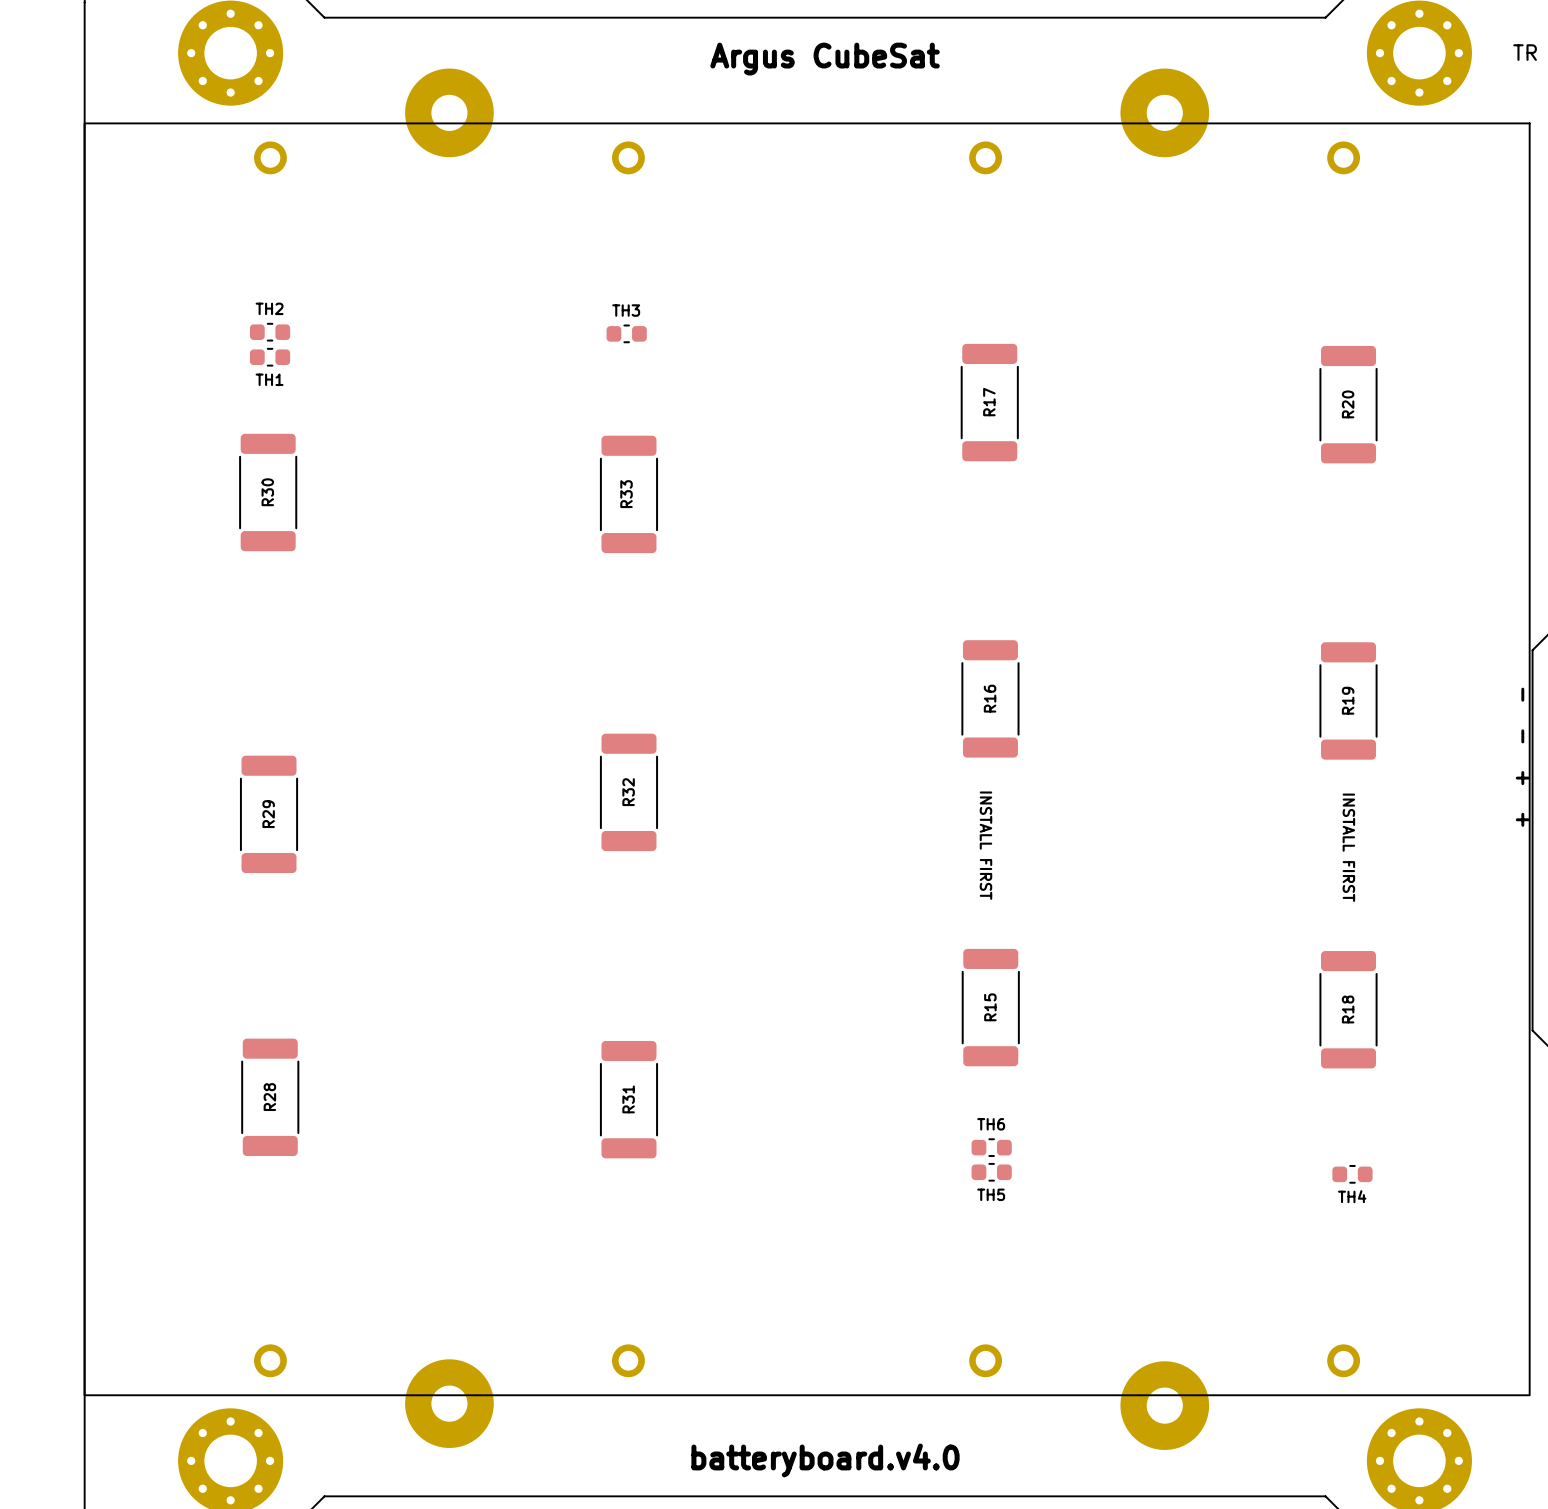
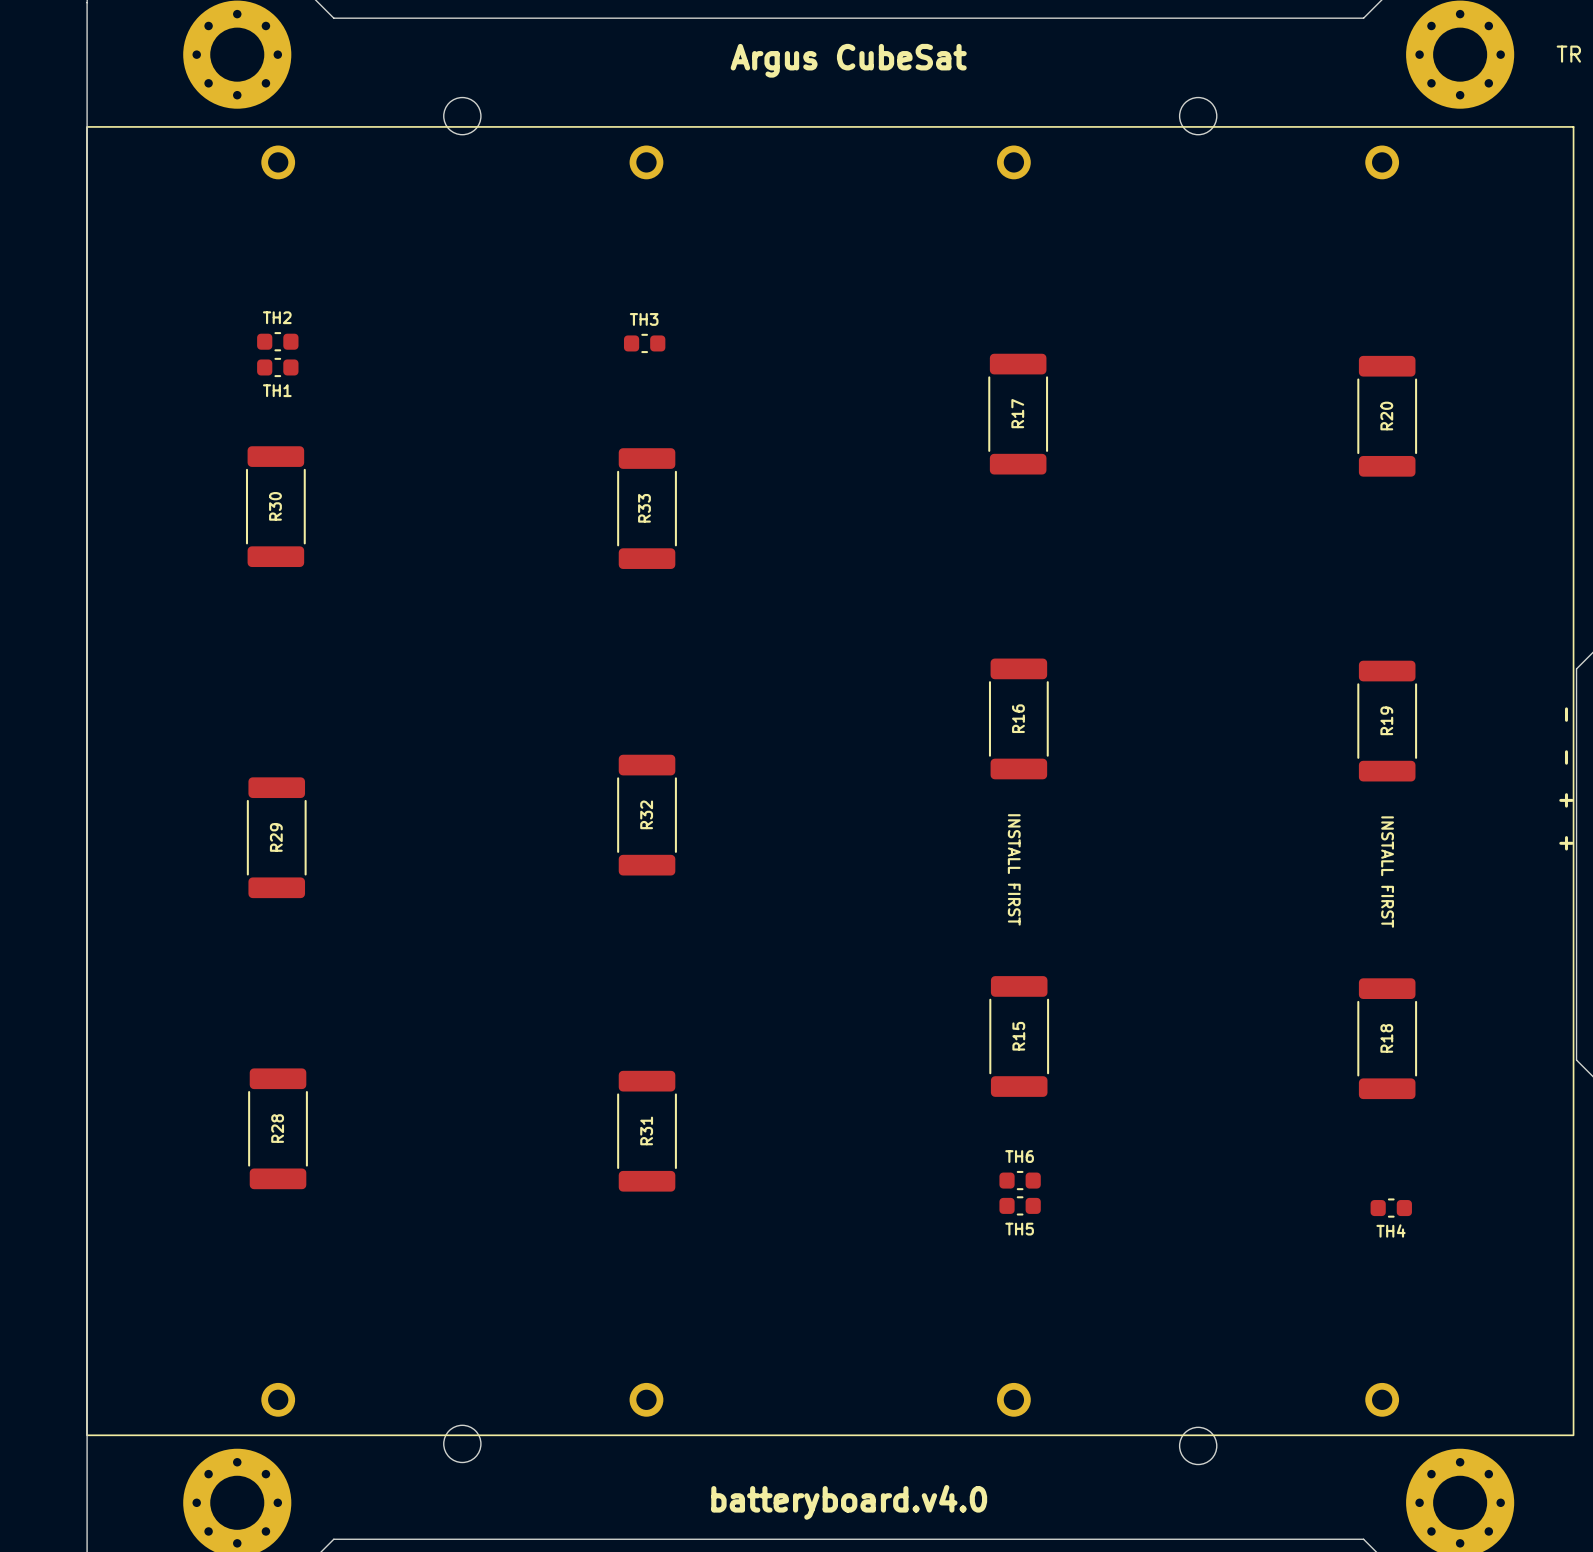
part footprint: [83, 68, 1531, 1450] -> [86, 97, 1575, 1465]

